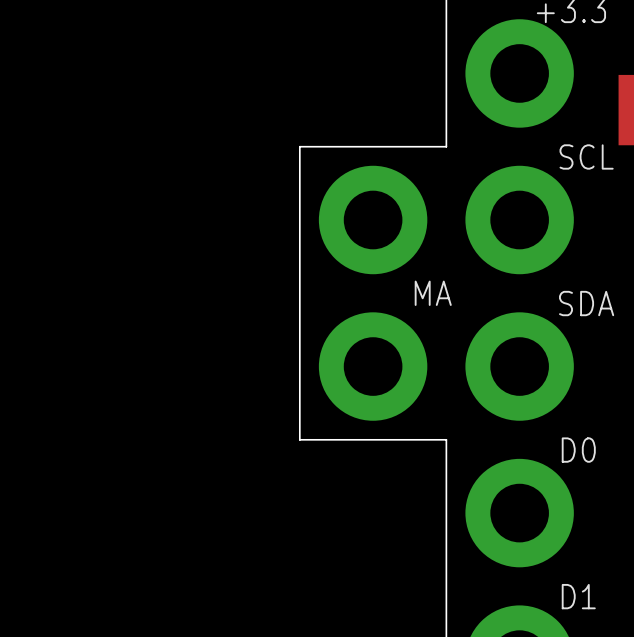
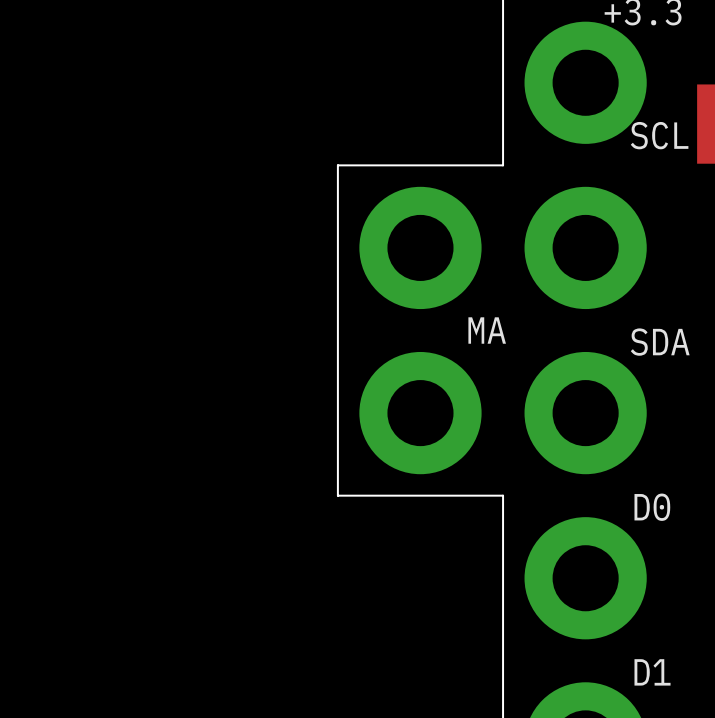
SCL name position: SCL (586, 156) -> SCL (659, 135)

